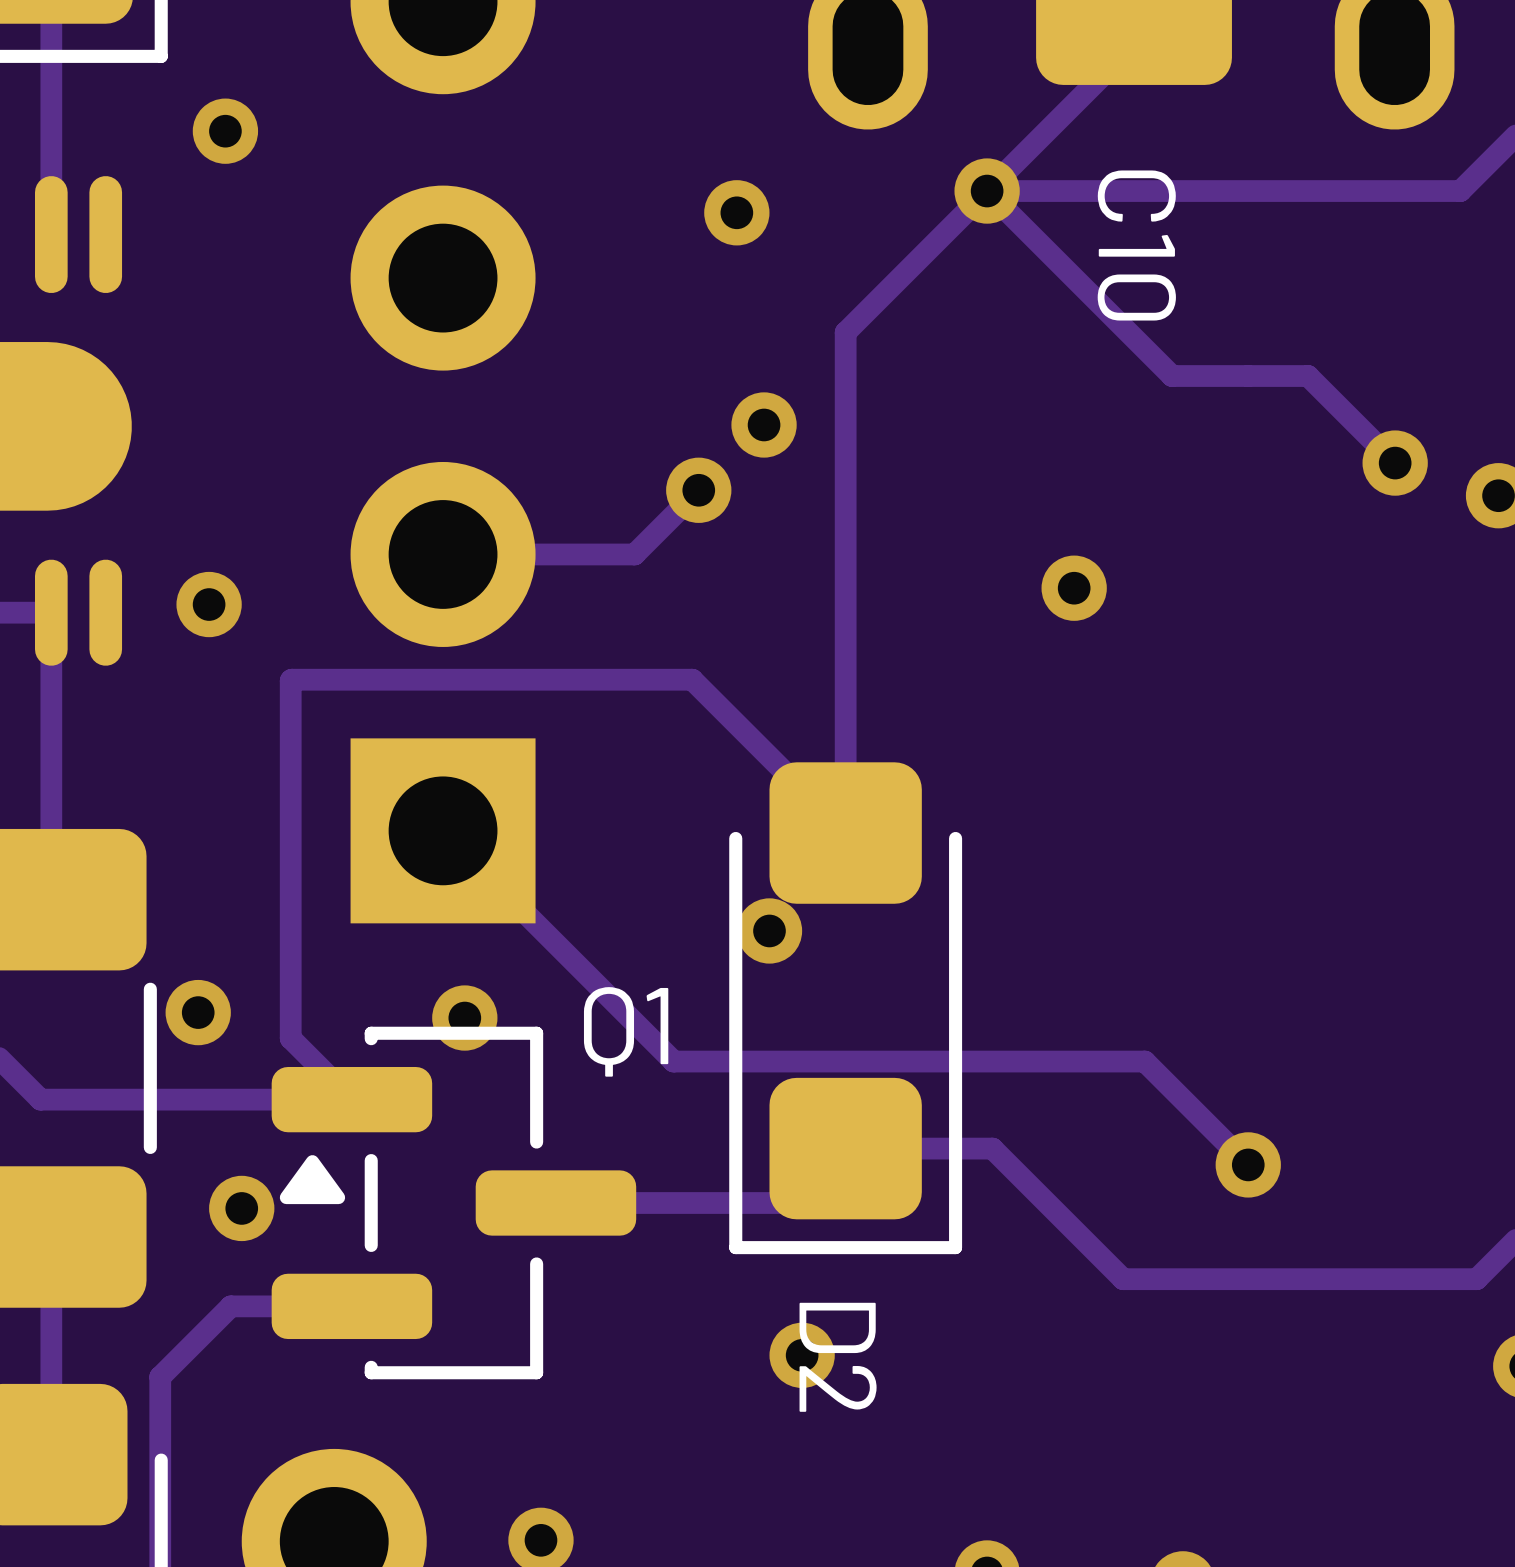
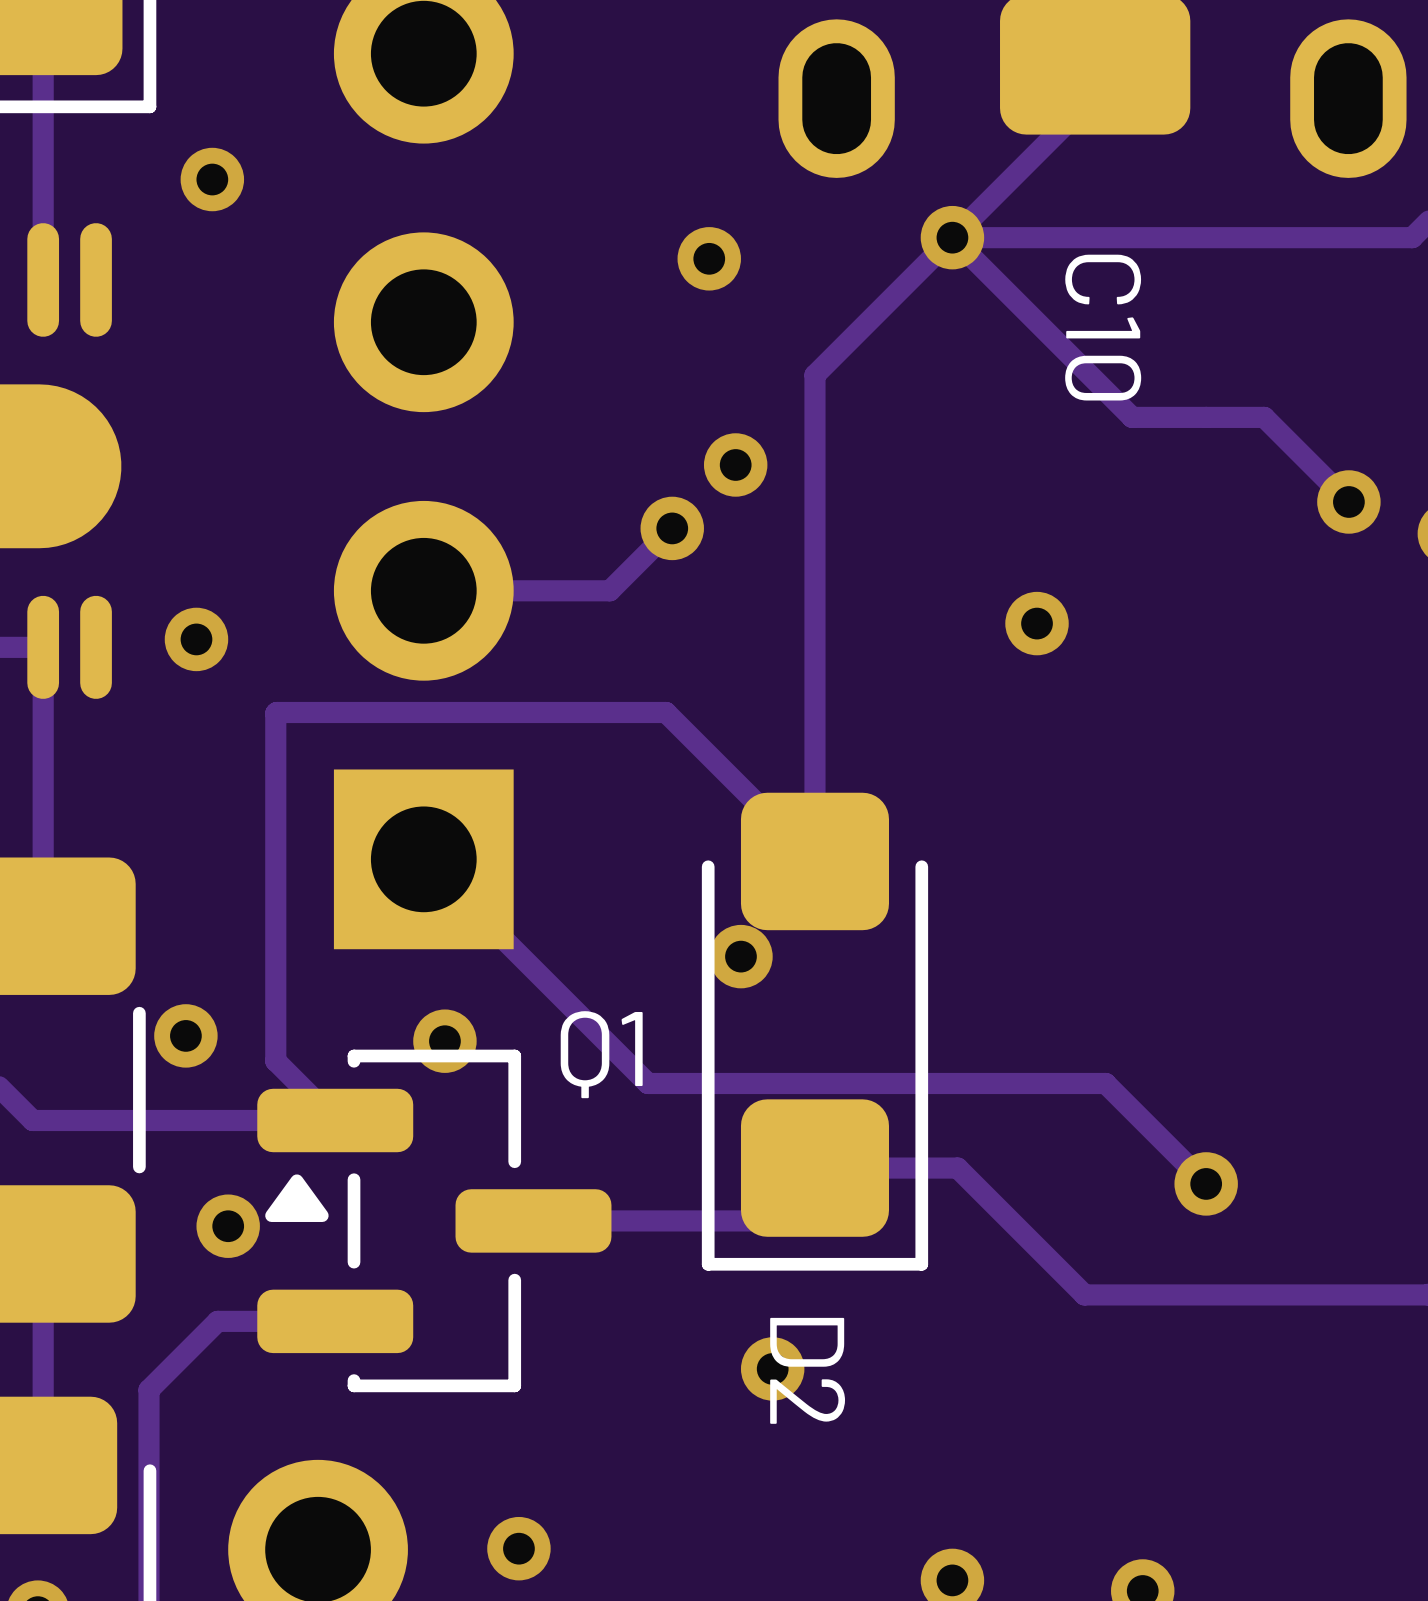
C10 name position: C10 (1136, 245) -> C10 (1103, 327)

